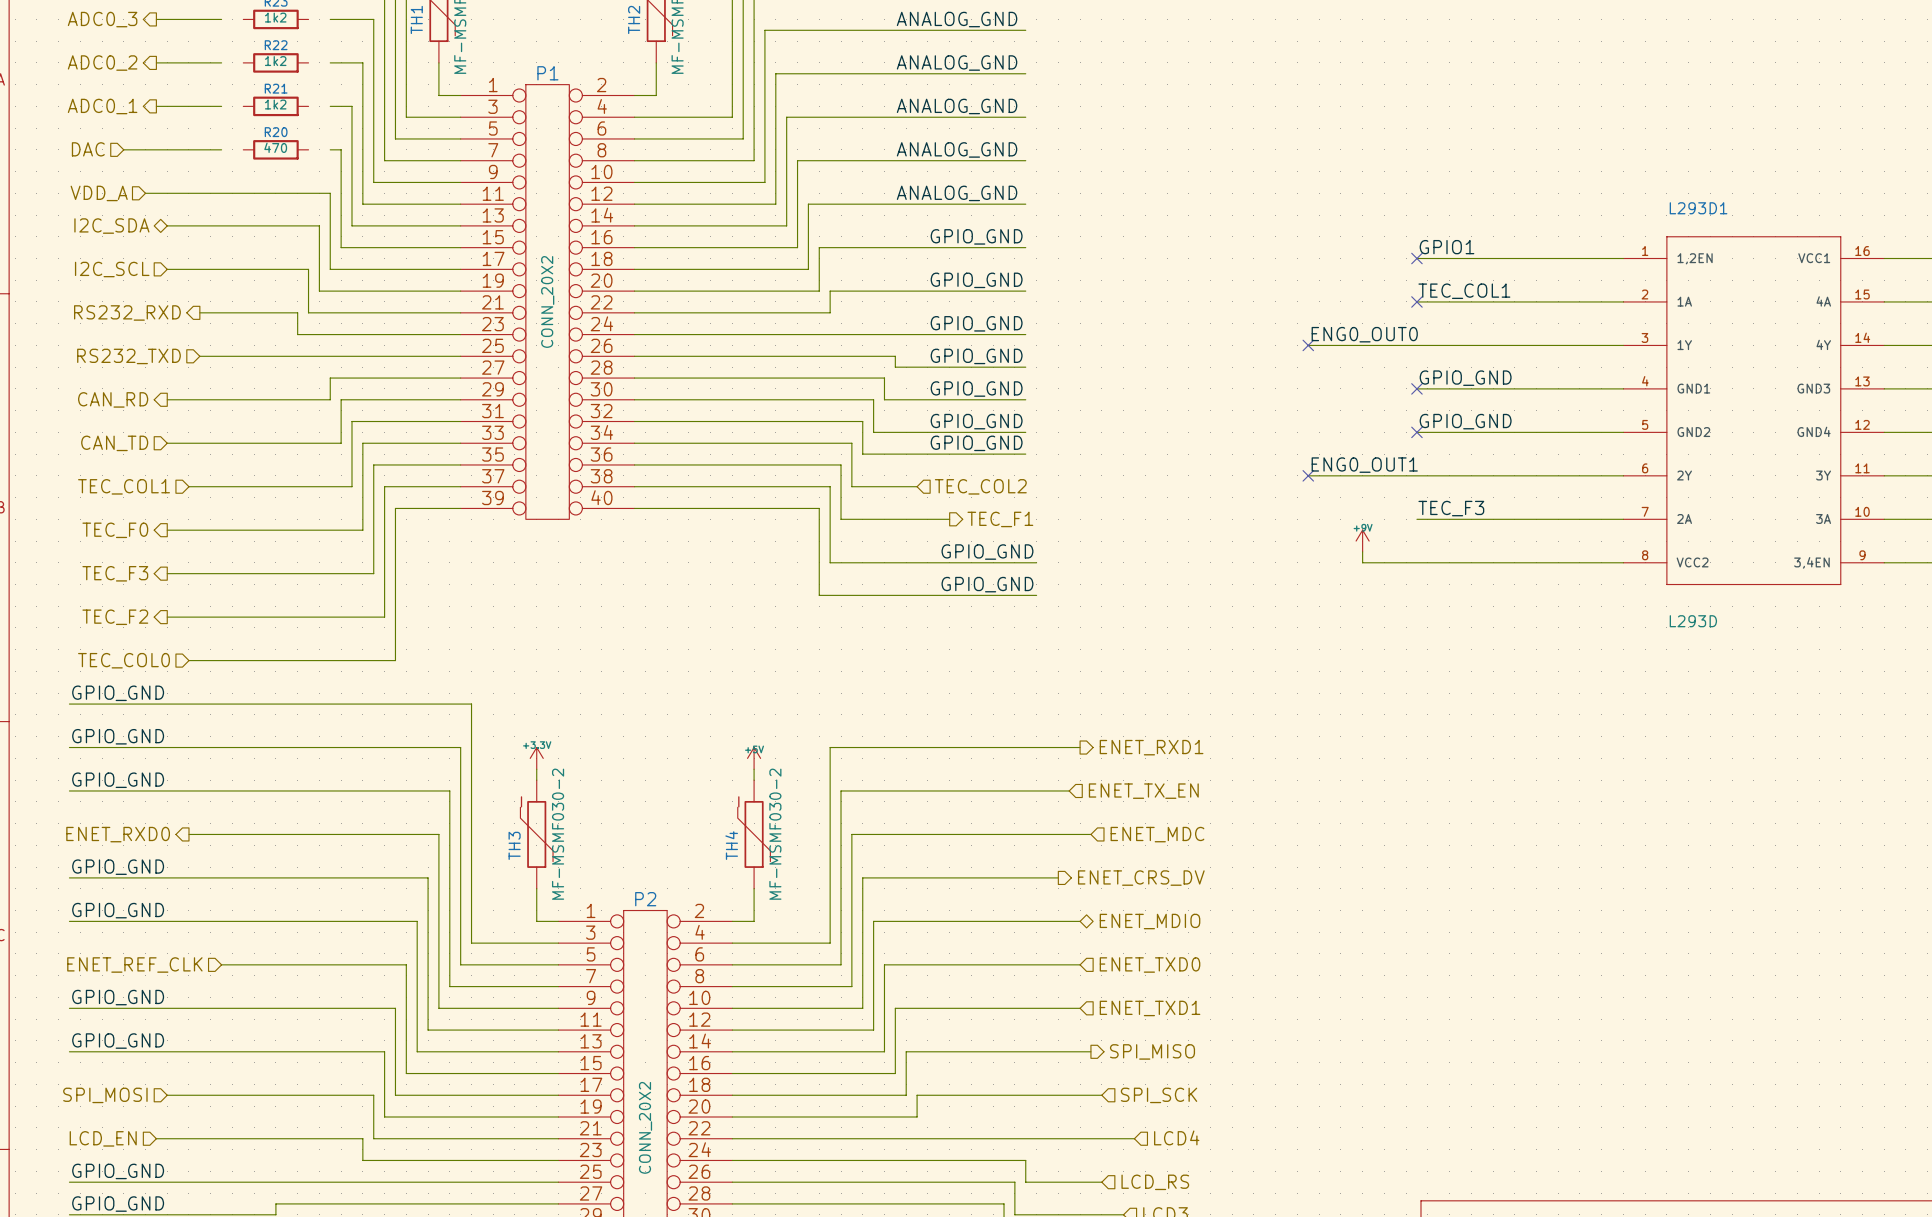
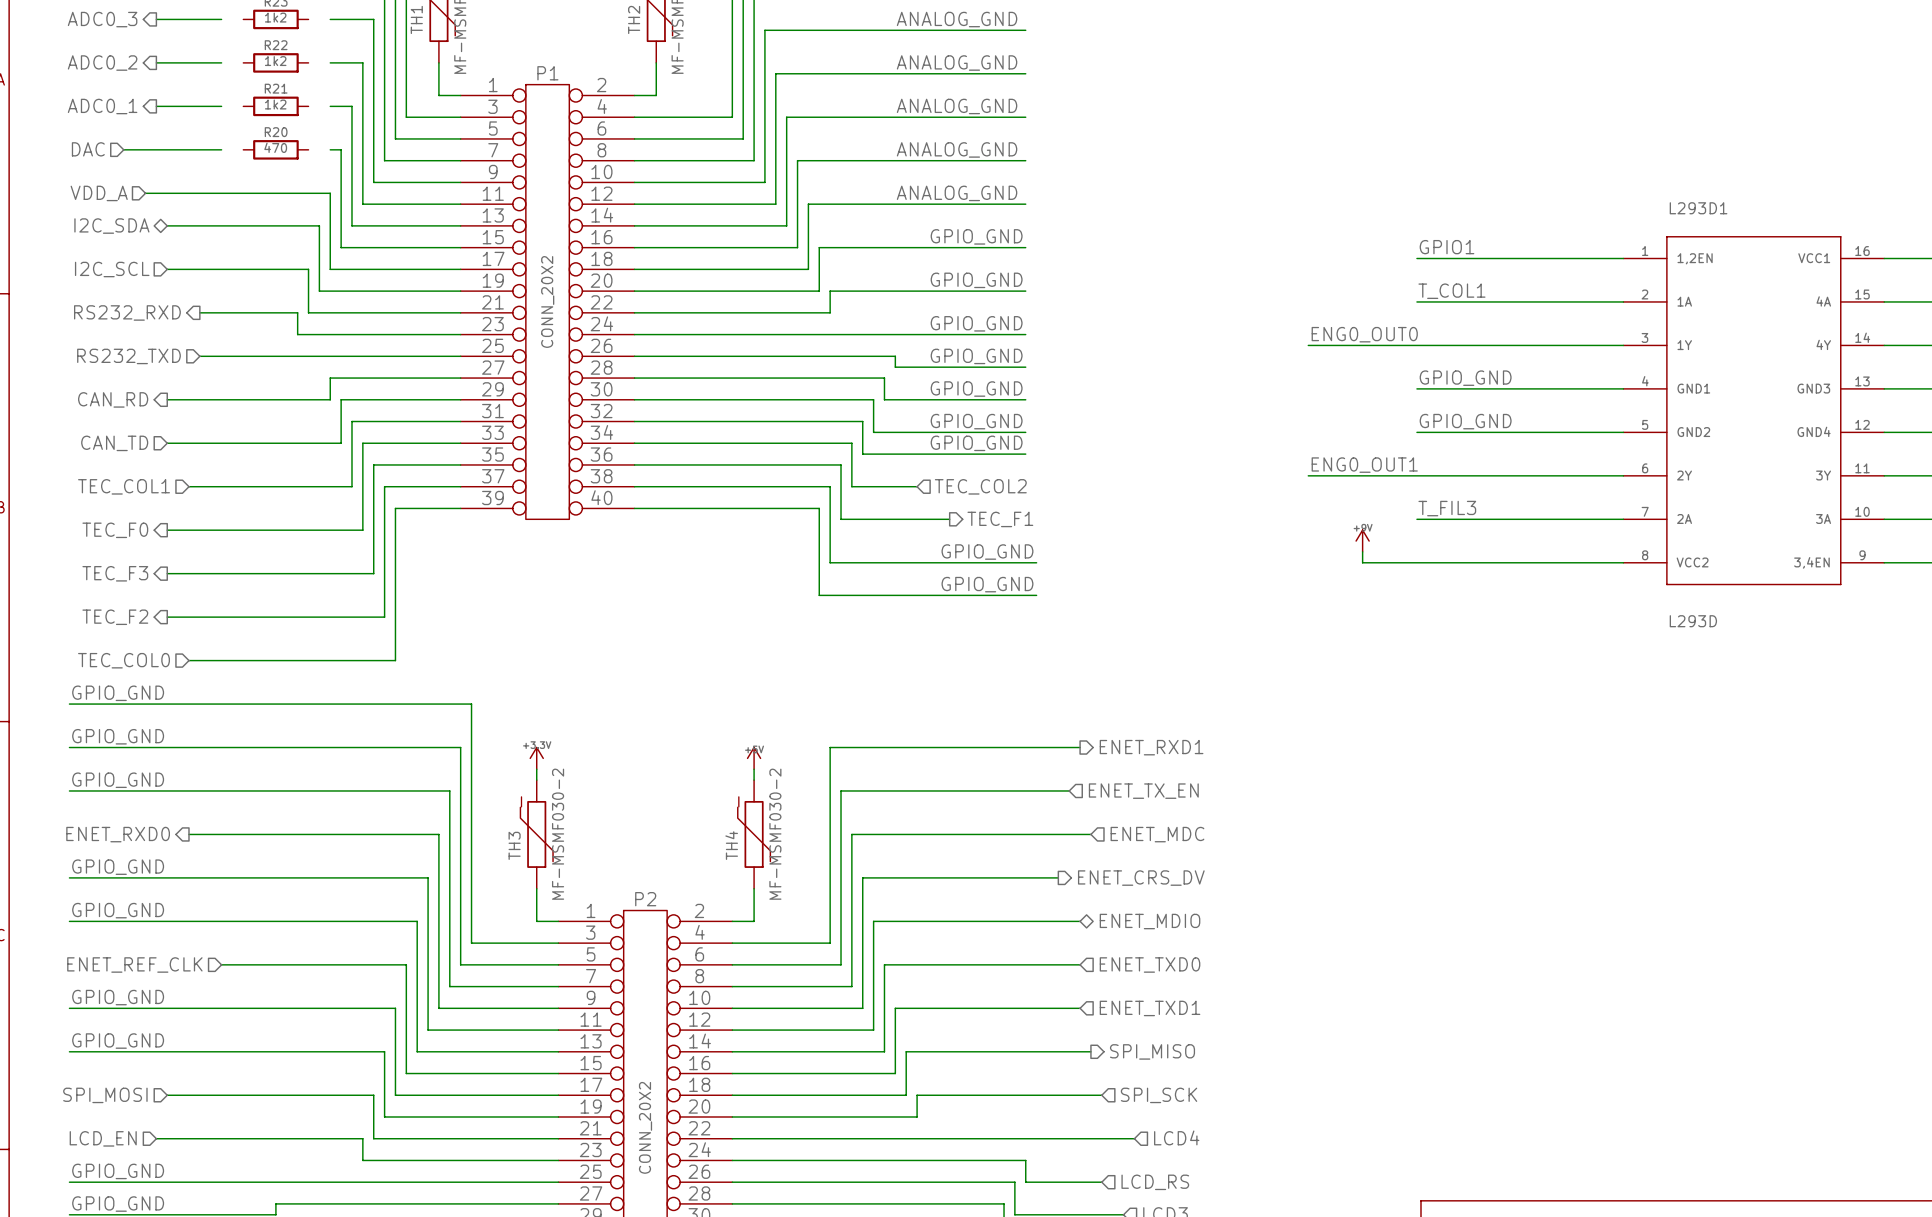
no-connect mark: (1416, 258) -> none
label: TEC_COL1 (1464, 291) -> T_COL1 (1451, 291)
no-connect mark: (1416, 301) -> none
no-connect mark: (1308, 345) -> none
no-connect mark: (1416, 388) -> none
no-connect mark: (1416, 432) -> none
no-connect mark: (1308, 475) -> none
label: TEC_F3 (1451, 508) -> T_FIL3 (1447, 508)

